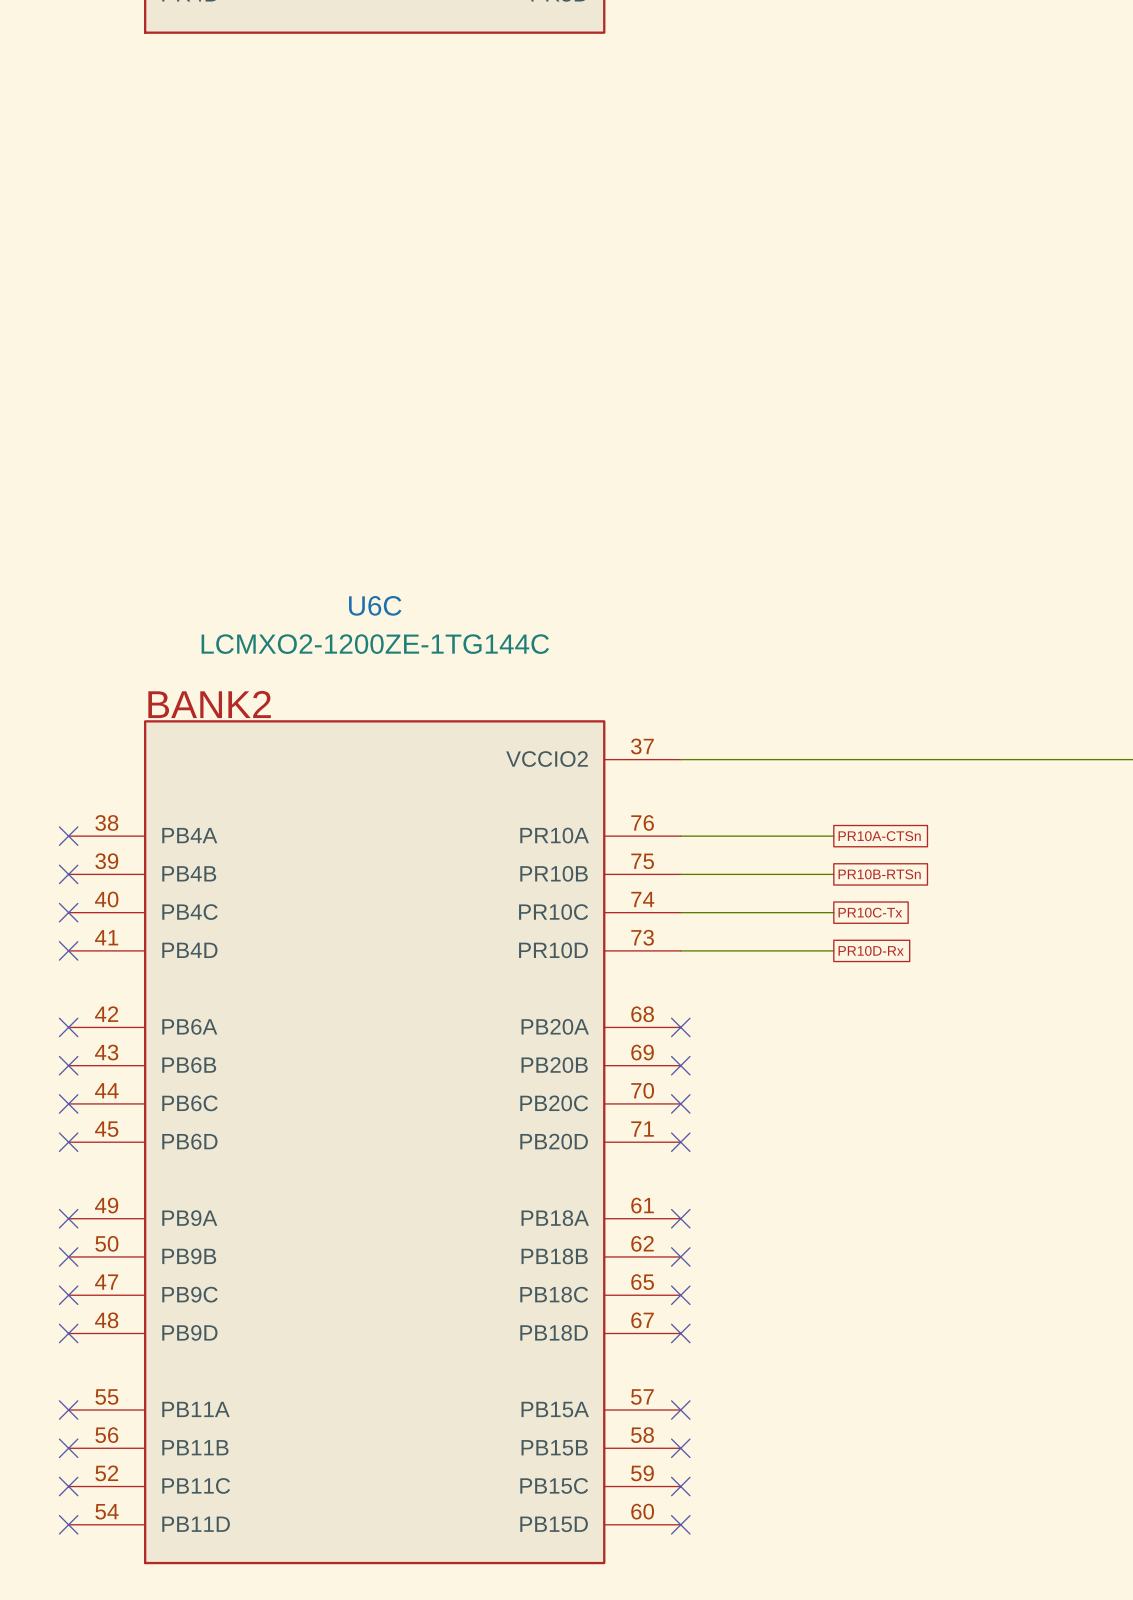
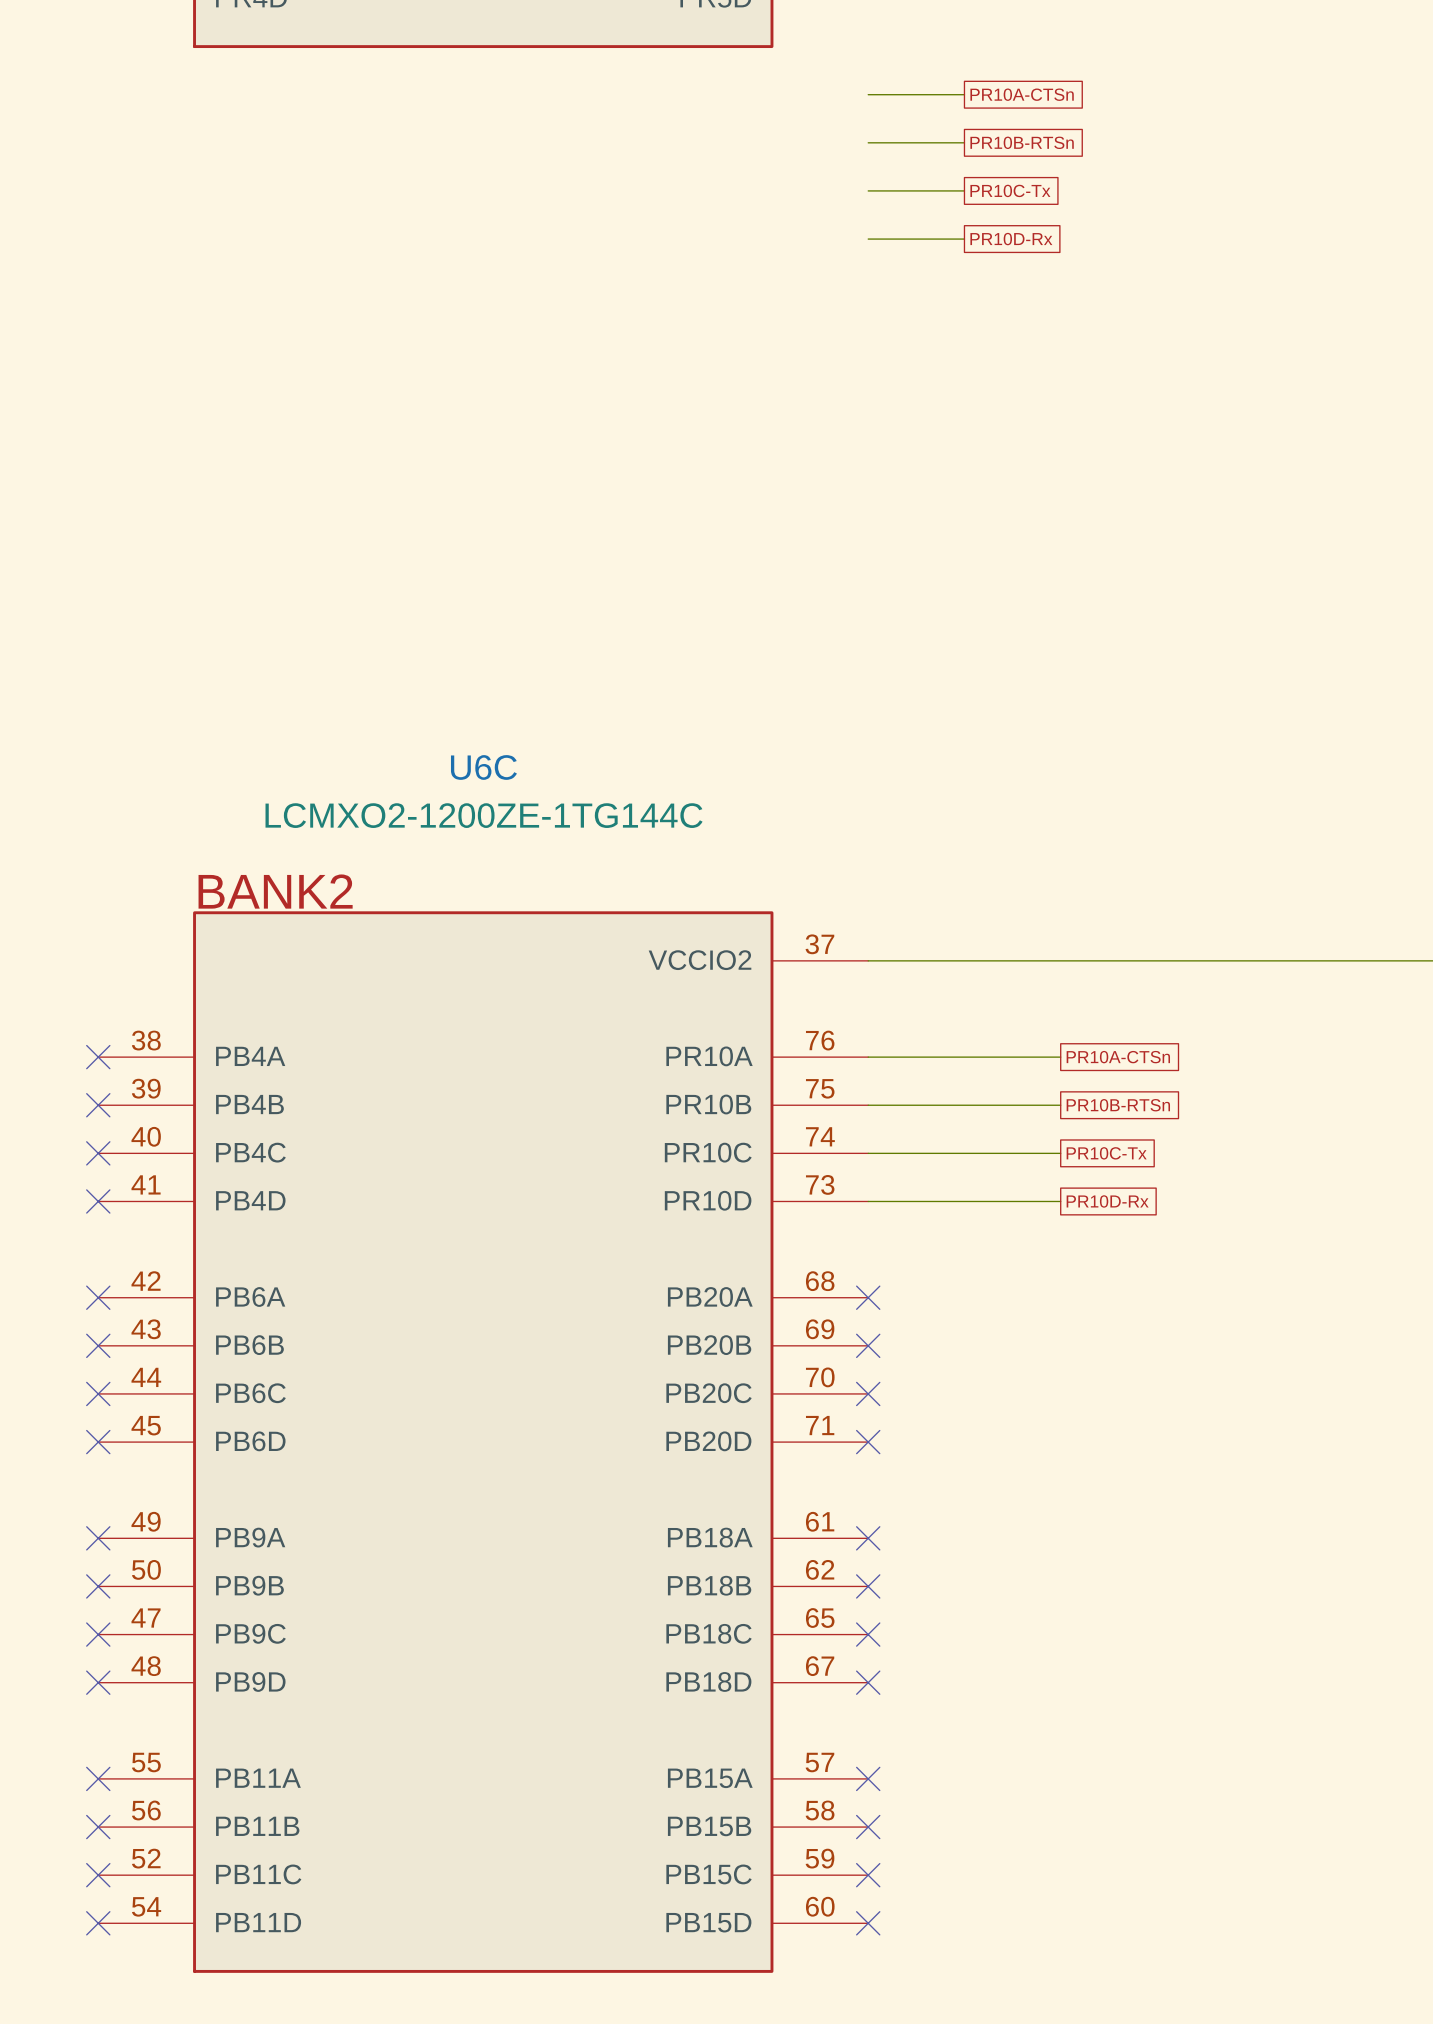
wire: none -> (868, 94) (964, 94)
global label: none -> PR10A-CTSn (1022, 94)
wire: none -> (868, 142) (964, 142)
global label: none -> PR10B-RTSn (1022, 142)
wire: none -> (868, 190) (964, 190)
global label: none -> PR10C-Tx (1010, 190)
wire: none -> (868, 239) (964, 239)
global label: none -> PR10D-Rx (1011, 239)

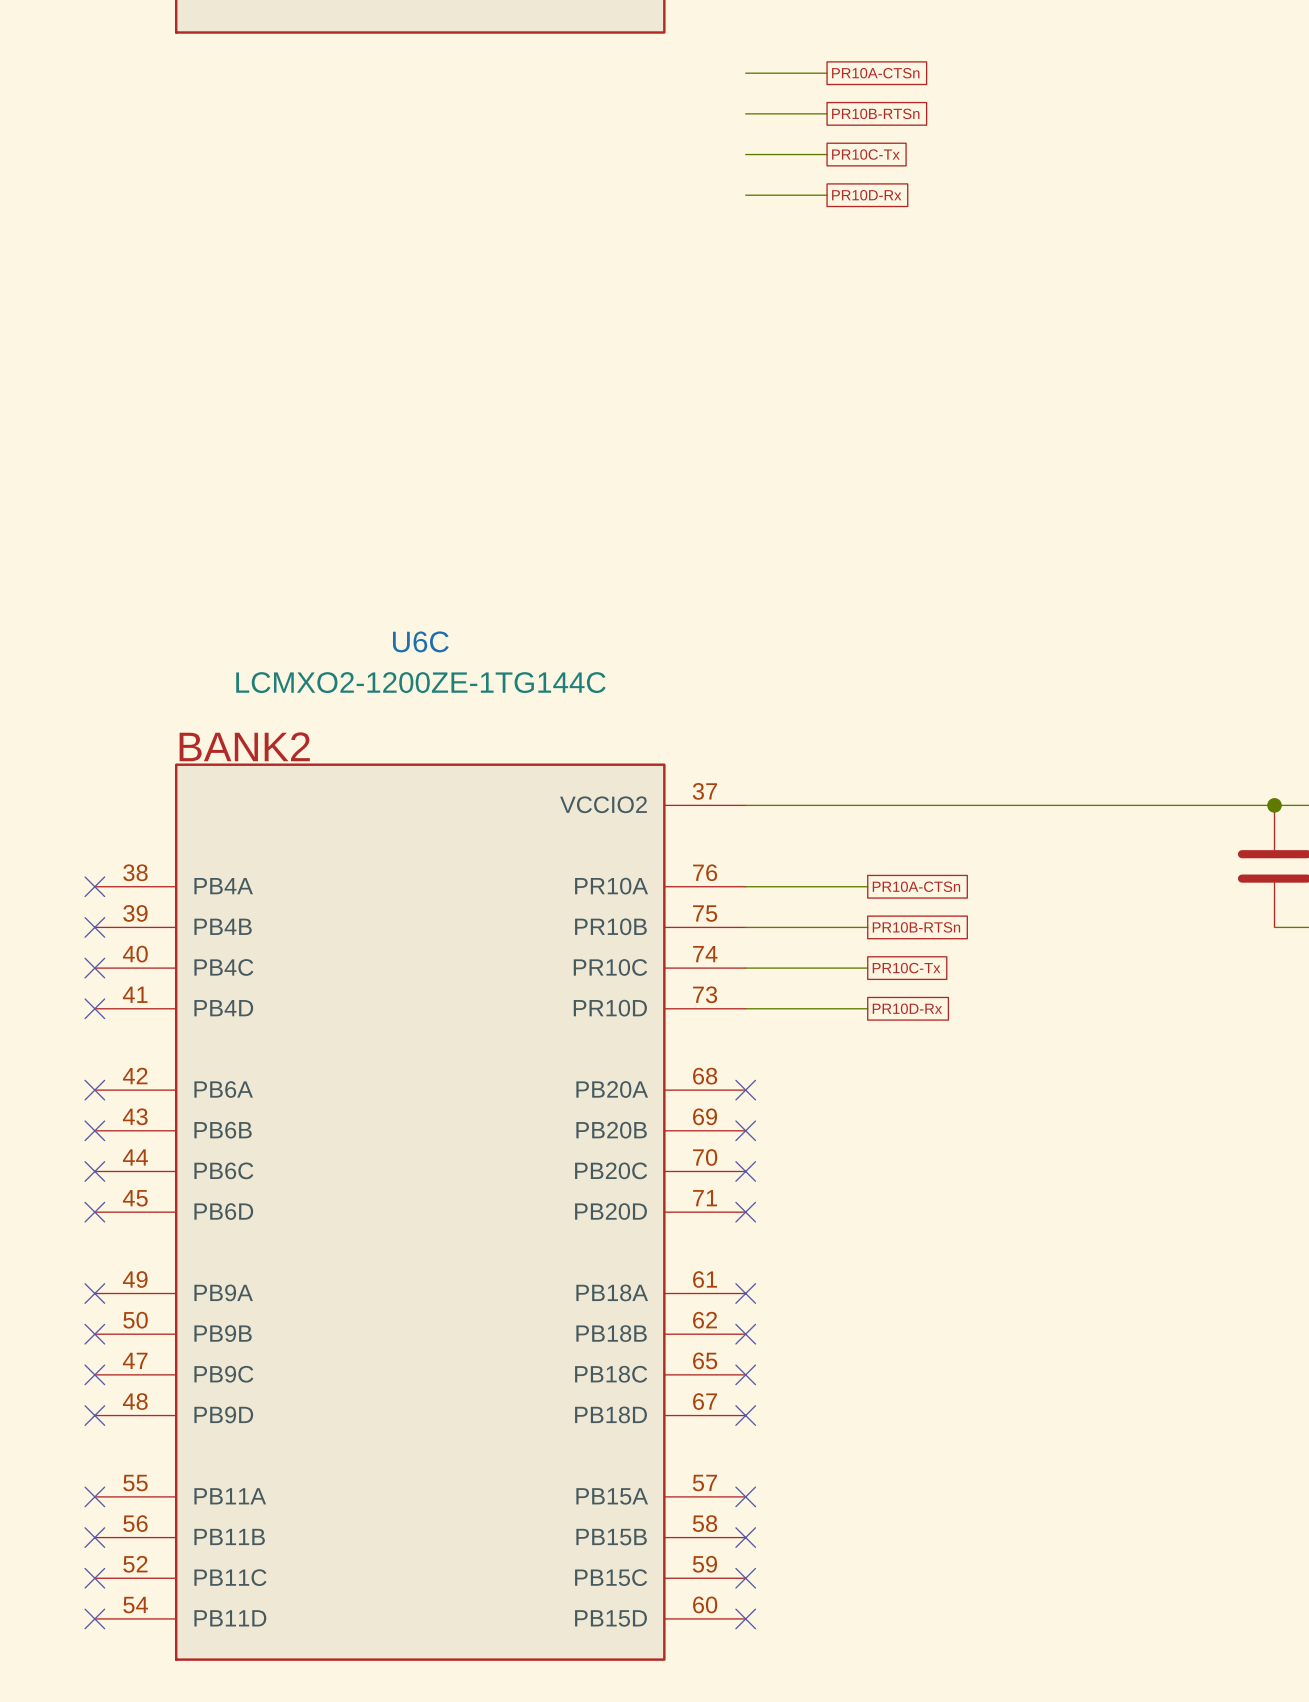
wire: (1012, 1057) (1060, 1057) -> none
global label position: PR10A-CTSn (1118, 1057) -> PR10A-CTSn (916, 886)
wire: (1012, 1105) (1060, 1105) -> none
global label position: PR10B-RTSn (1118, 1105) -> PR10B-RTSn (916, 927)
wire: (1012, 1153) (1060, 1153) -> none
global label position: PR10C-Tx (1106, 1153) -> PR10C-Tx (906, 968)
wire: (1012, 1201) (1060, 1201) -> none
global label position: PR10D-Rx (1107, 1201) -> PR10D-Rx (907, 1008)

